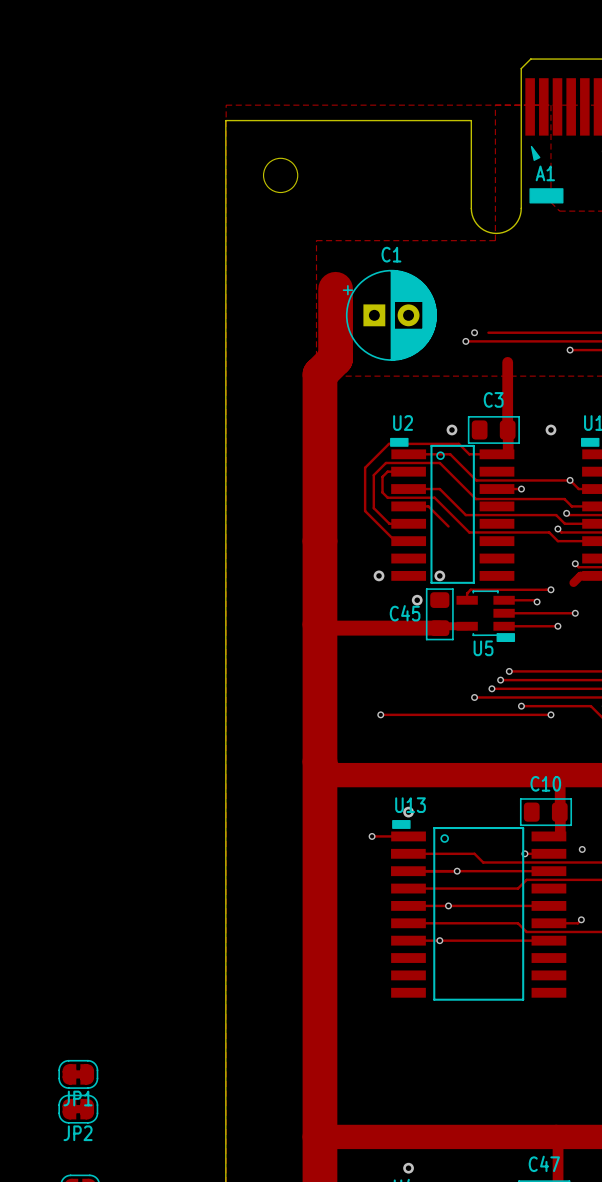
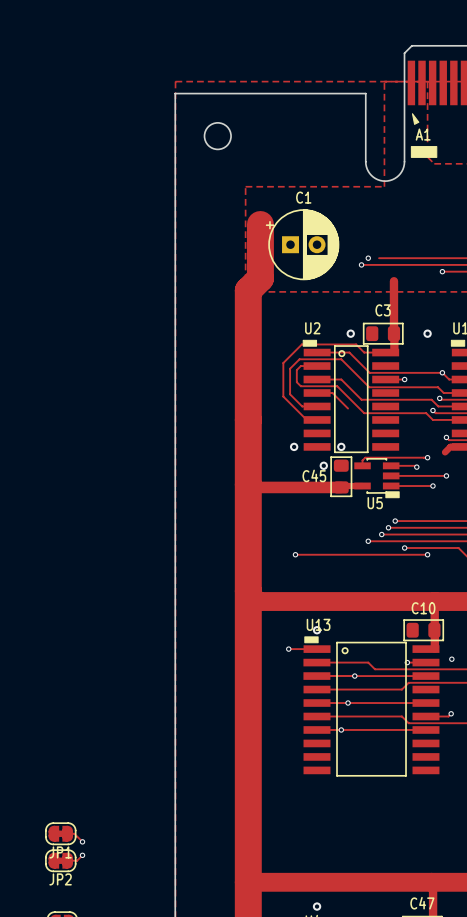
track: none -> (67, 833) (74, 833) (82, 841)
via: none -> (82, 841)
track: none -> (82, 855) (77, 860) (67, 860)
via: none -> (82, 855)

